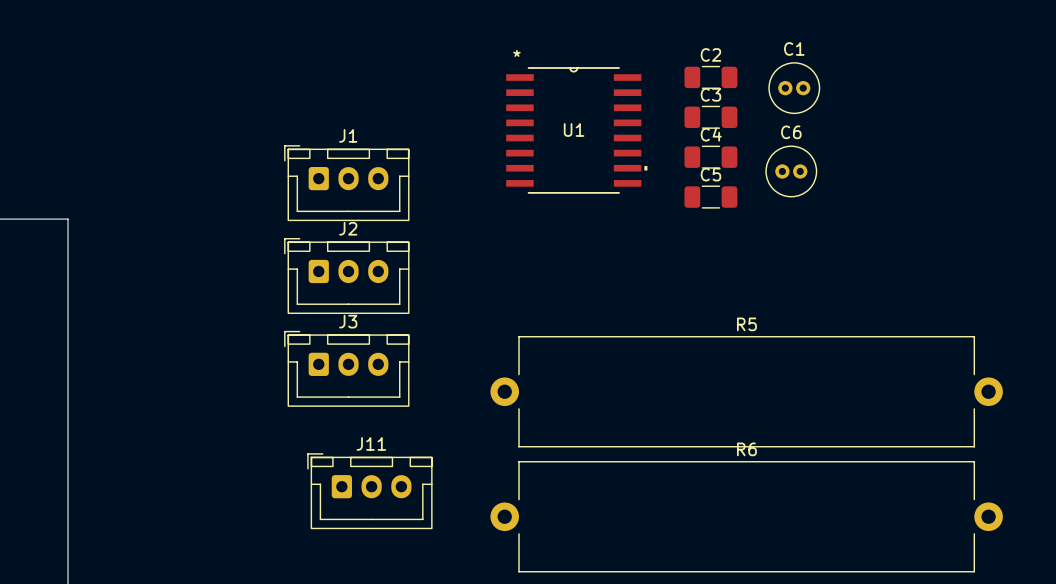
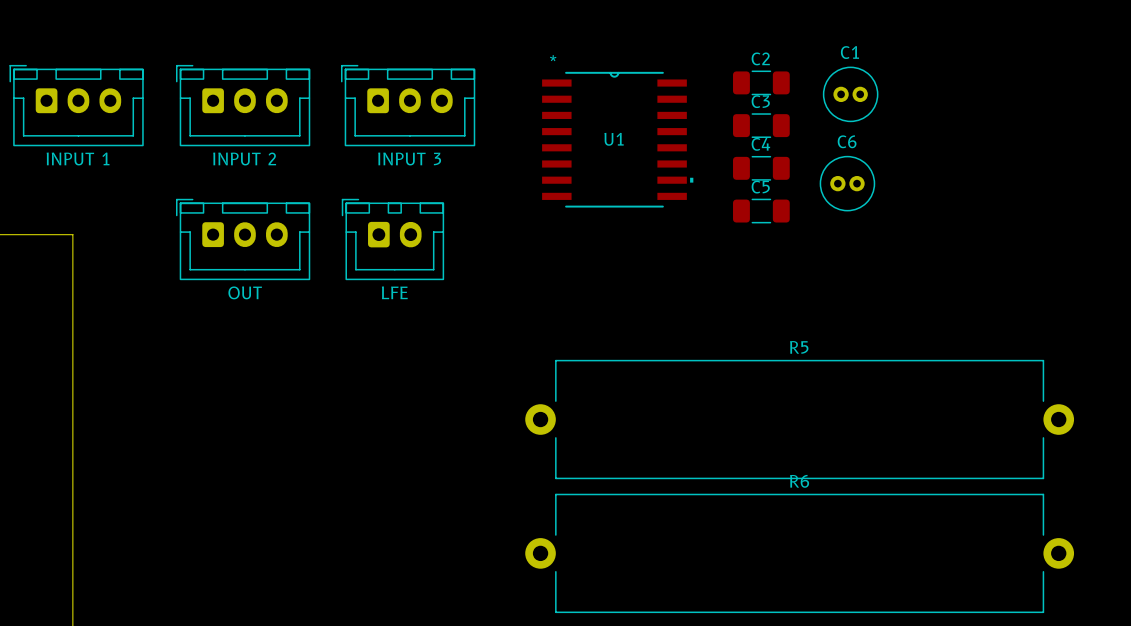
part: none -> INPUT 1 (76, 105)
part: none -> INPUT 2 (243, 105)
part: none -> INPUT 3 (408, 105)
J1: (346, 183) -> none
part: none -> OUT (243, 239)
part: none -> LFE (392, 239)
J2: (346, 276) -> none
J3: (346, 368) -> none
J11: (369, 491) -> none

